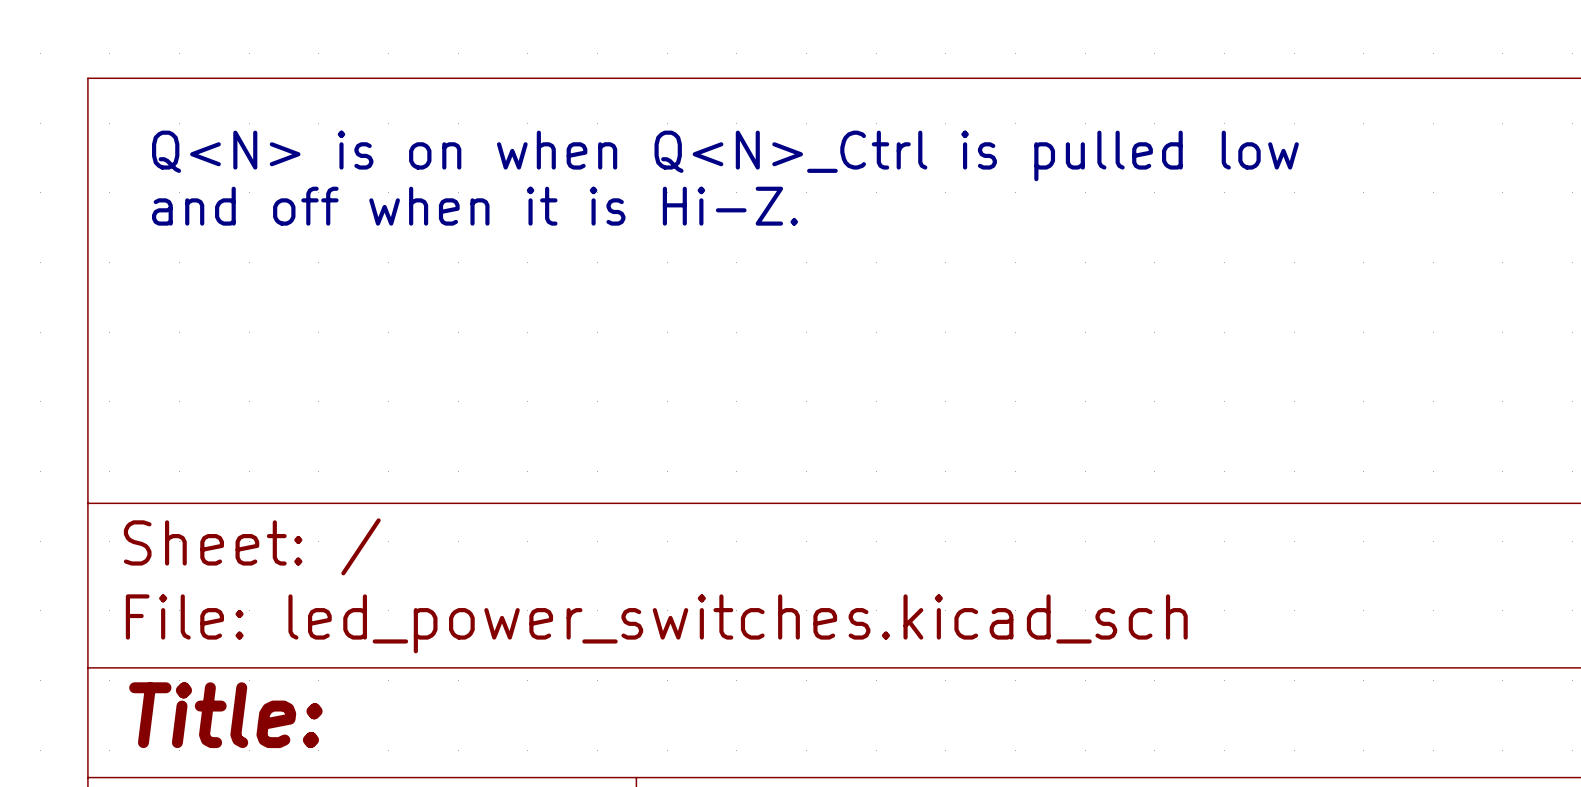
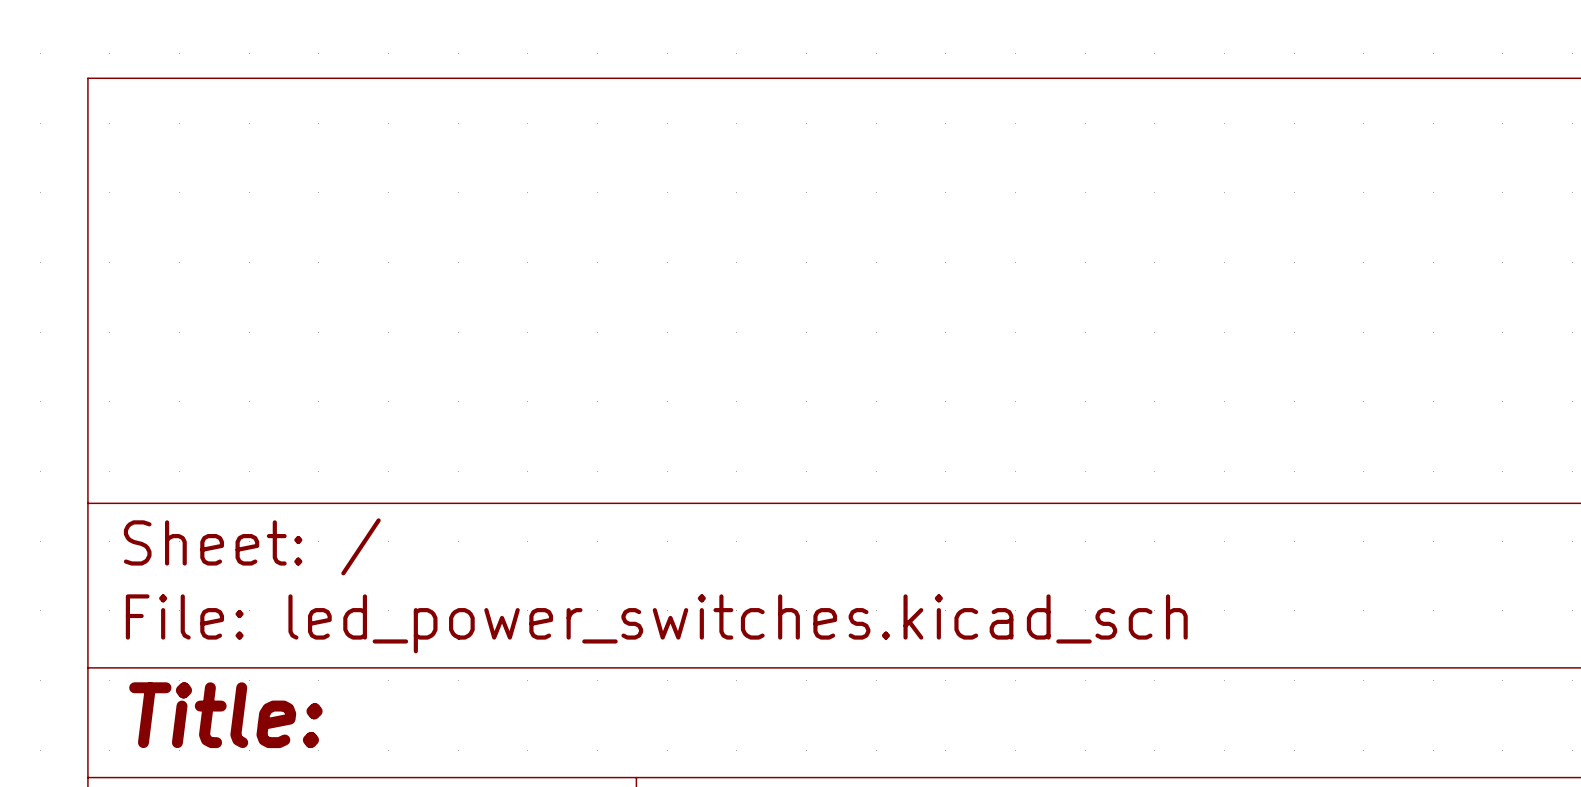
text: Q<N> is on when Q<N>_Ctrl is pulled low (725, 155) -> none
text: and off when it is Hi-Z. (474, 206) -> none

